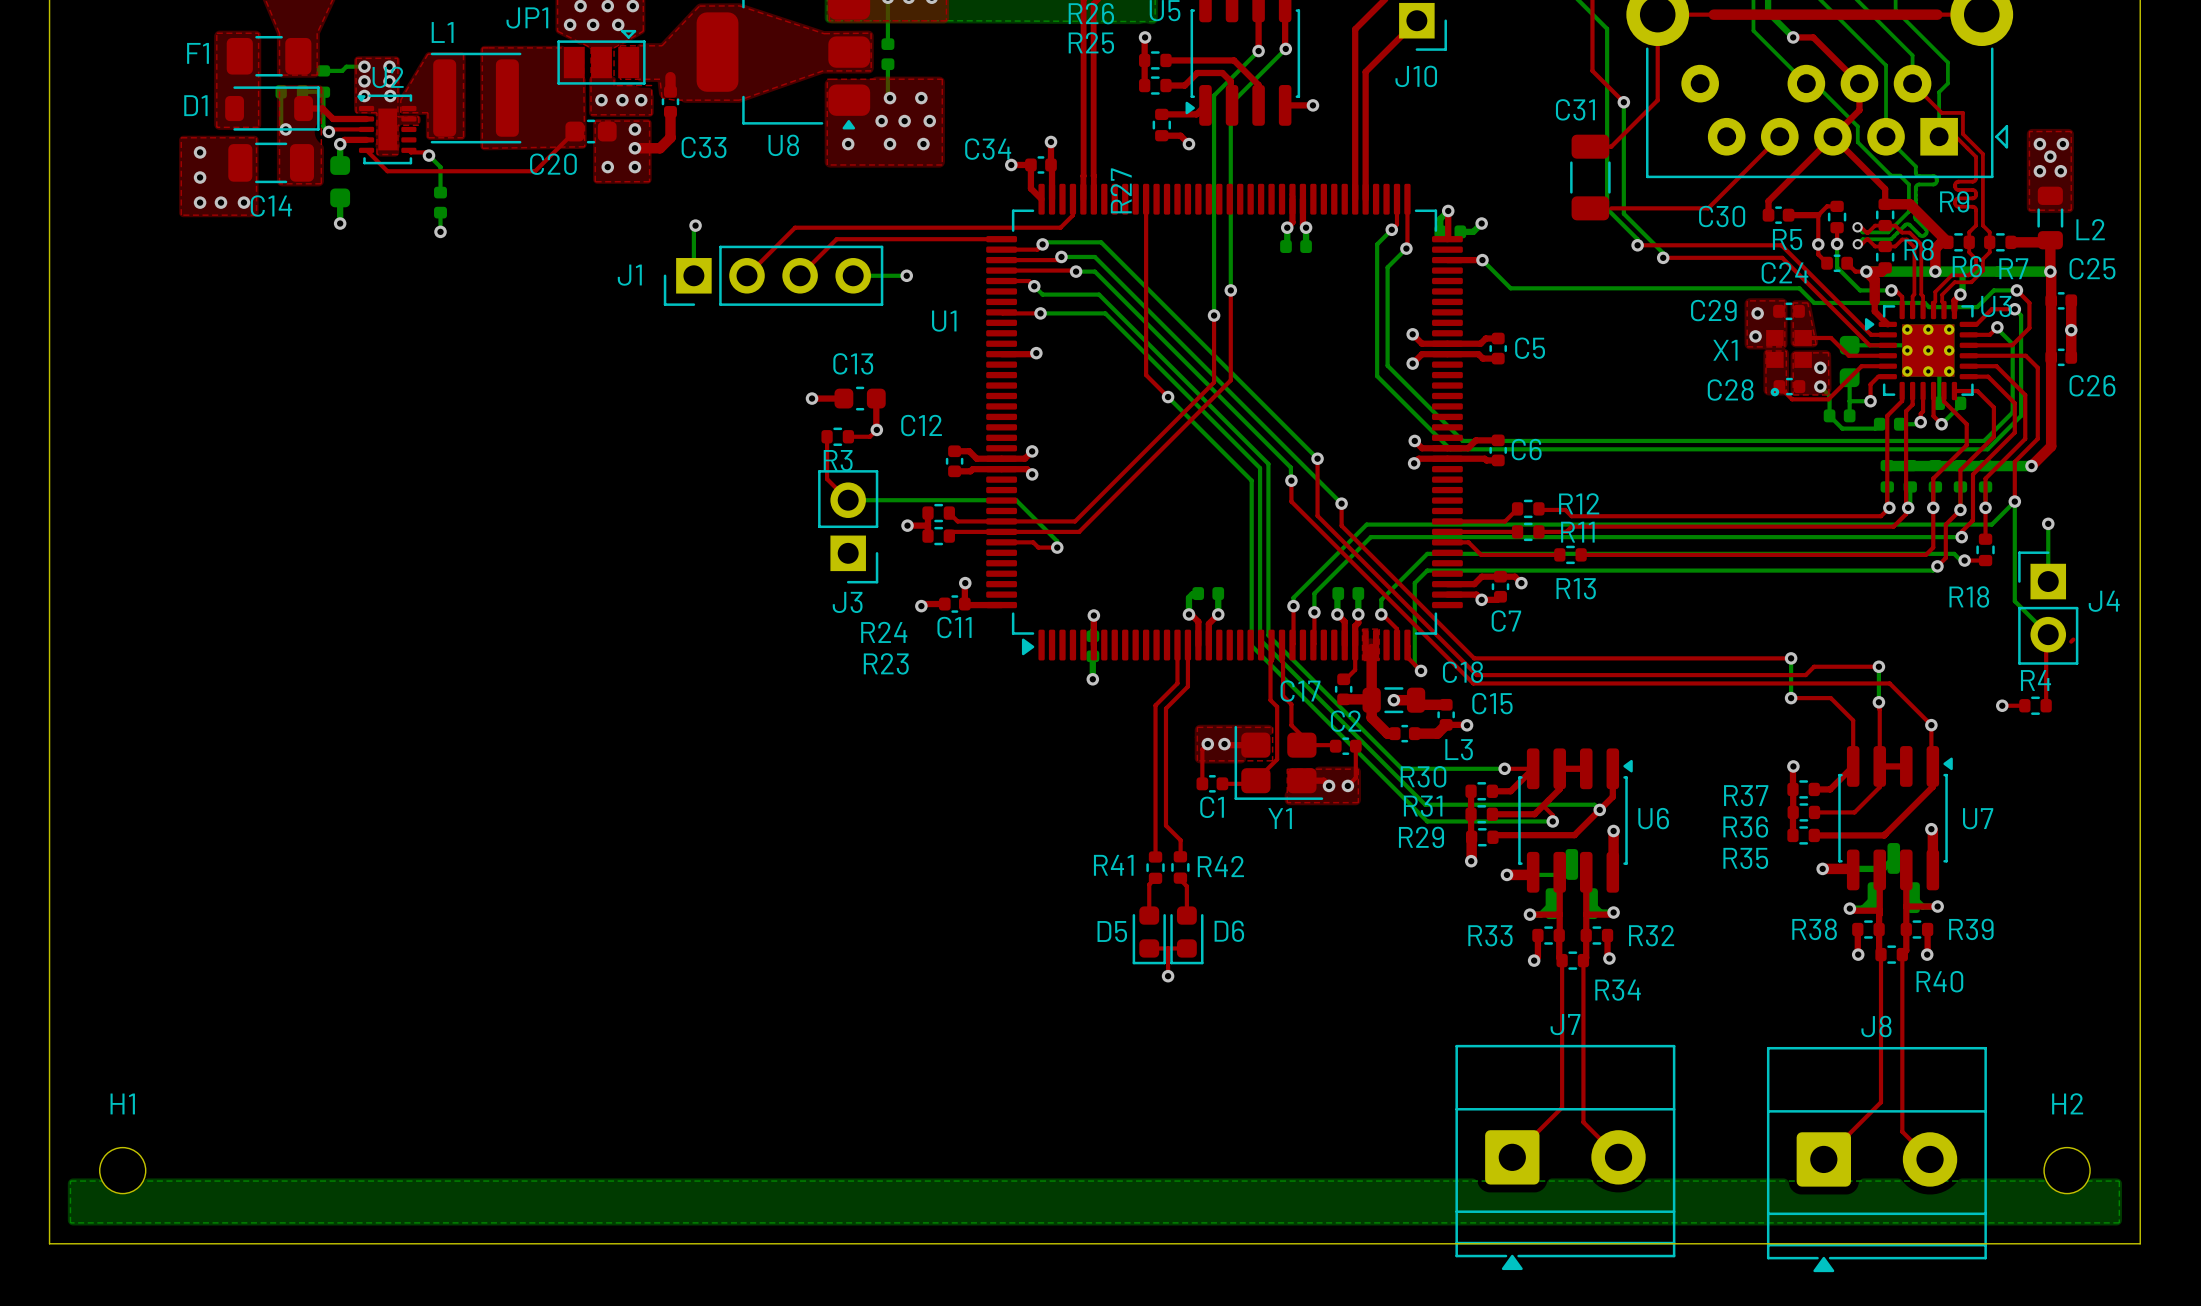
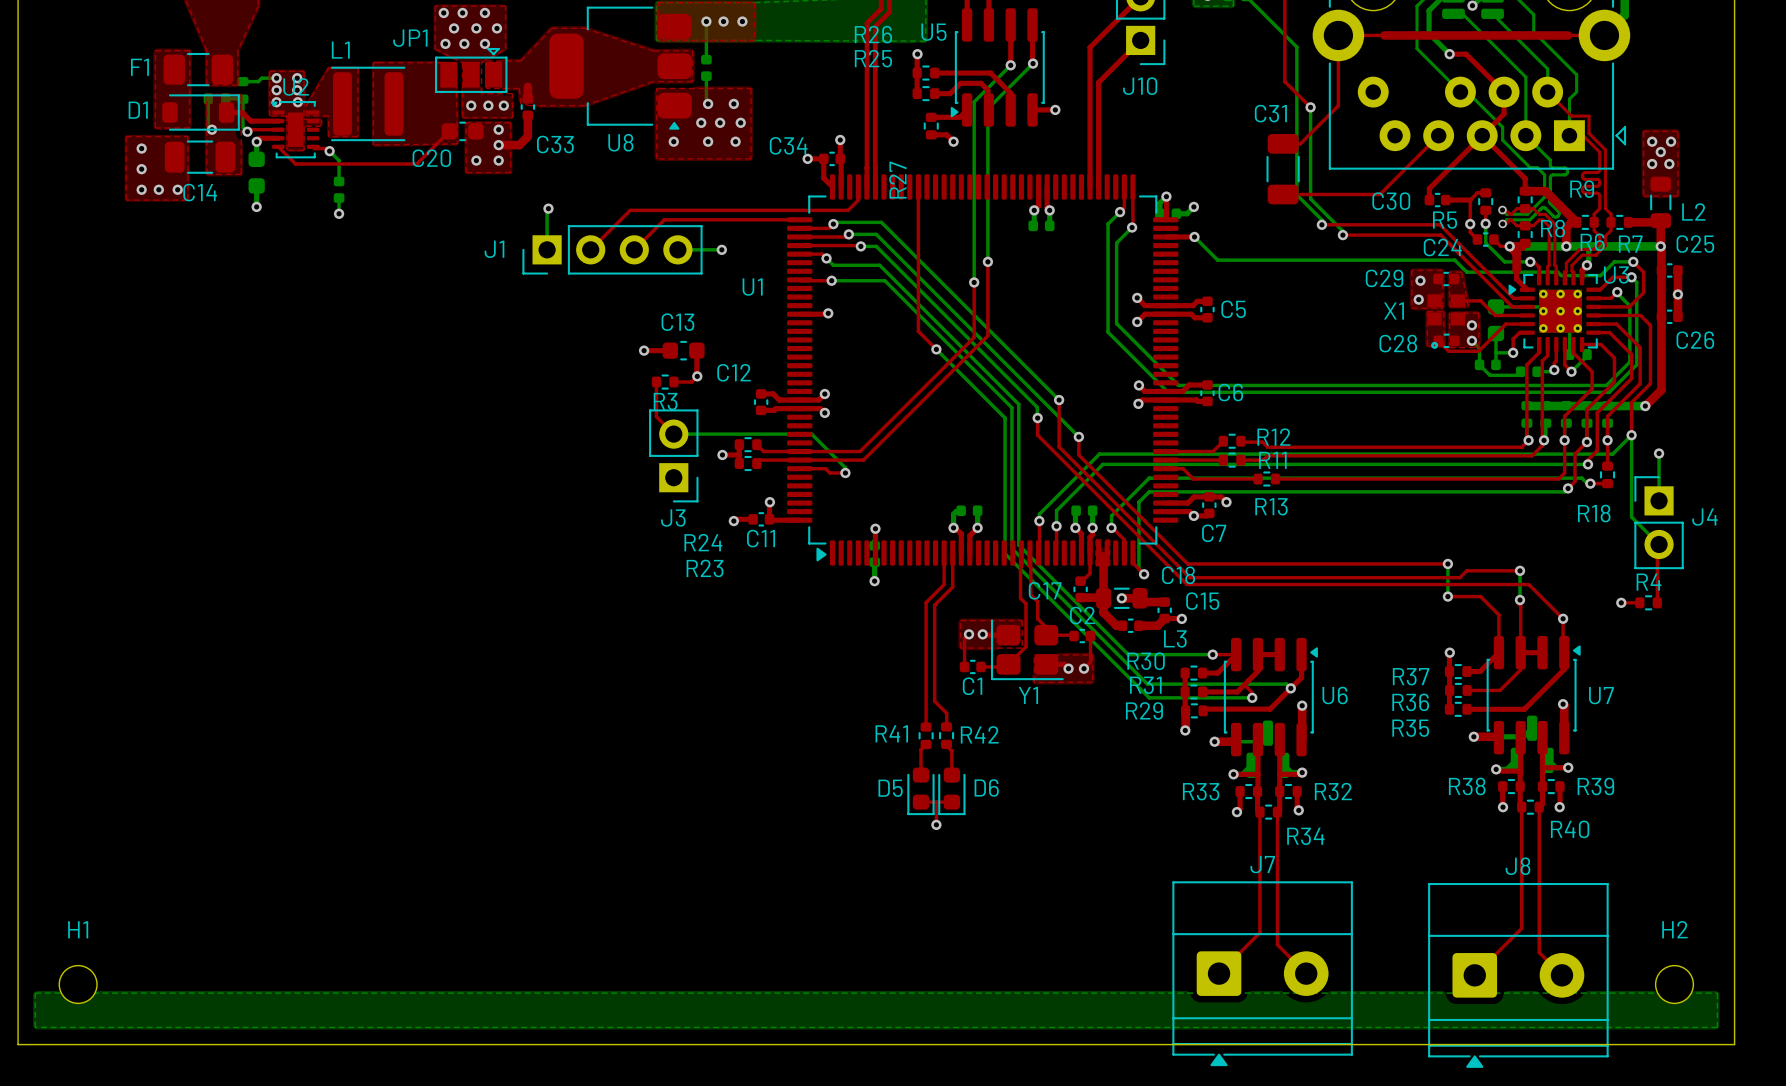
top track: (2073, 639) (2071, 641) -> none

